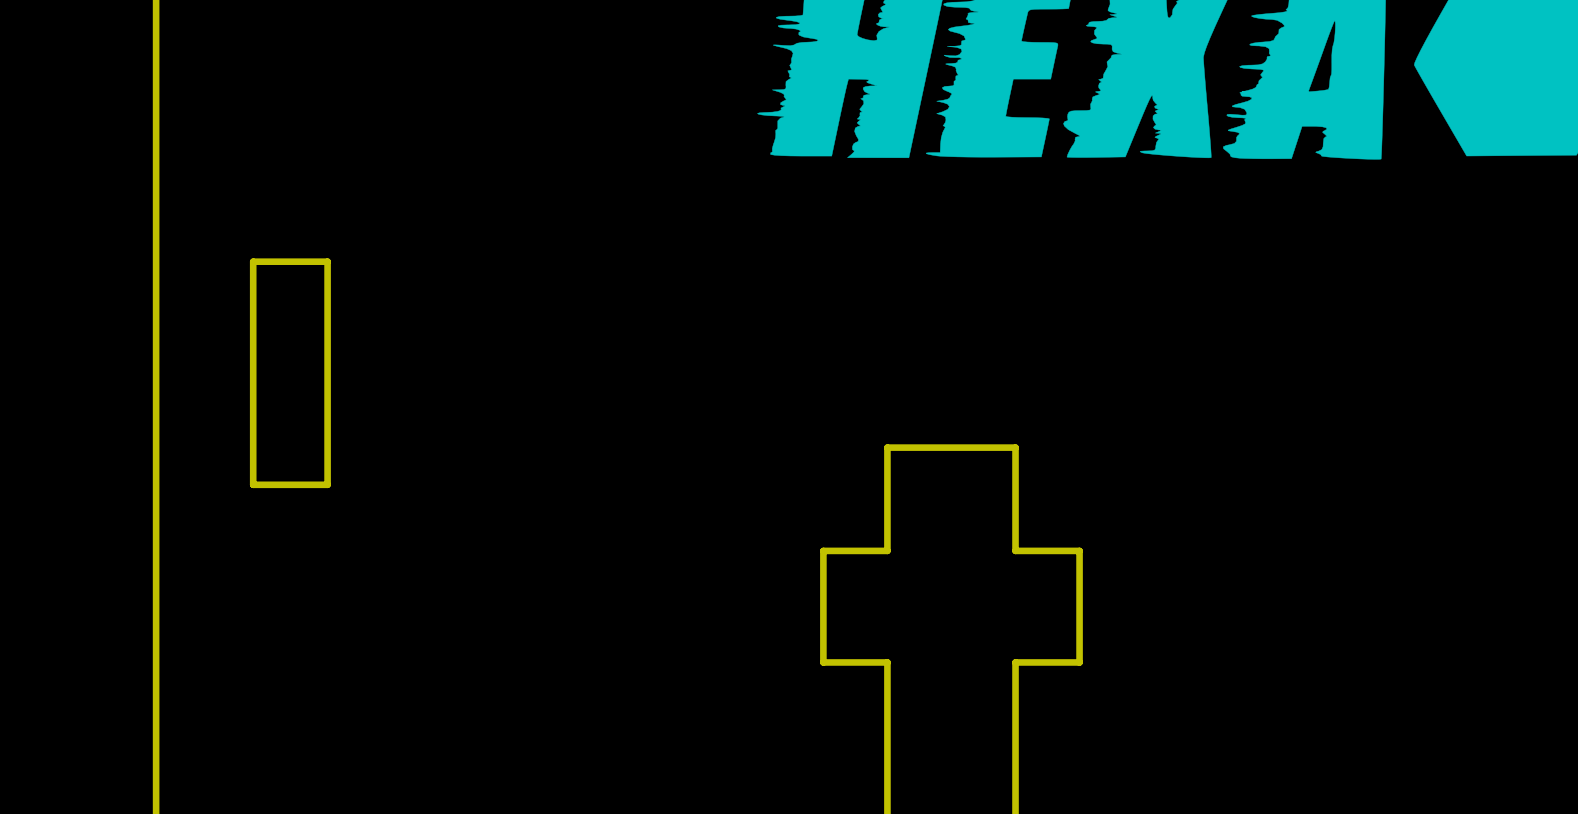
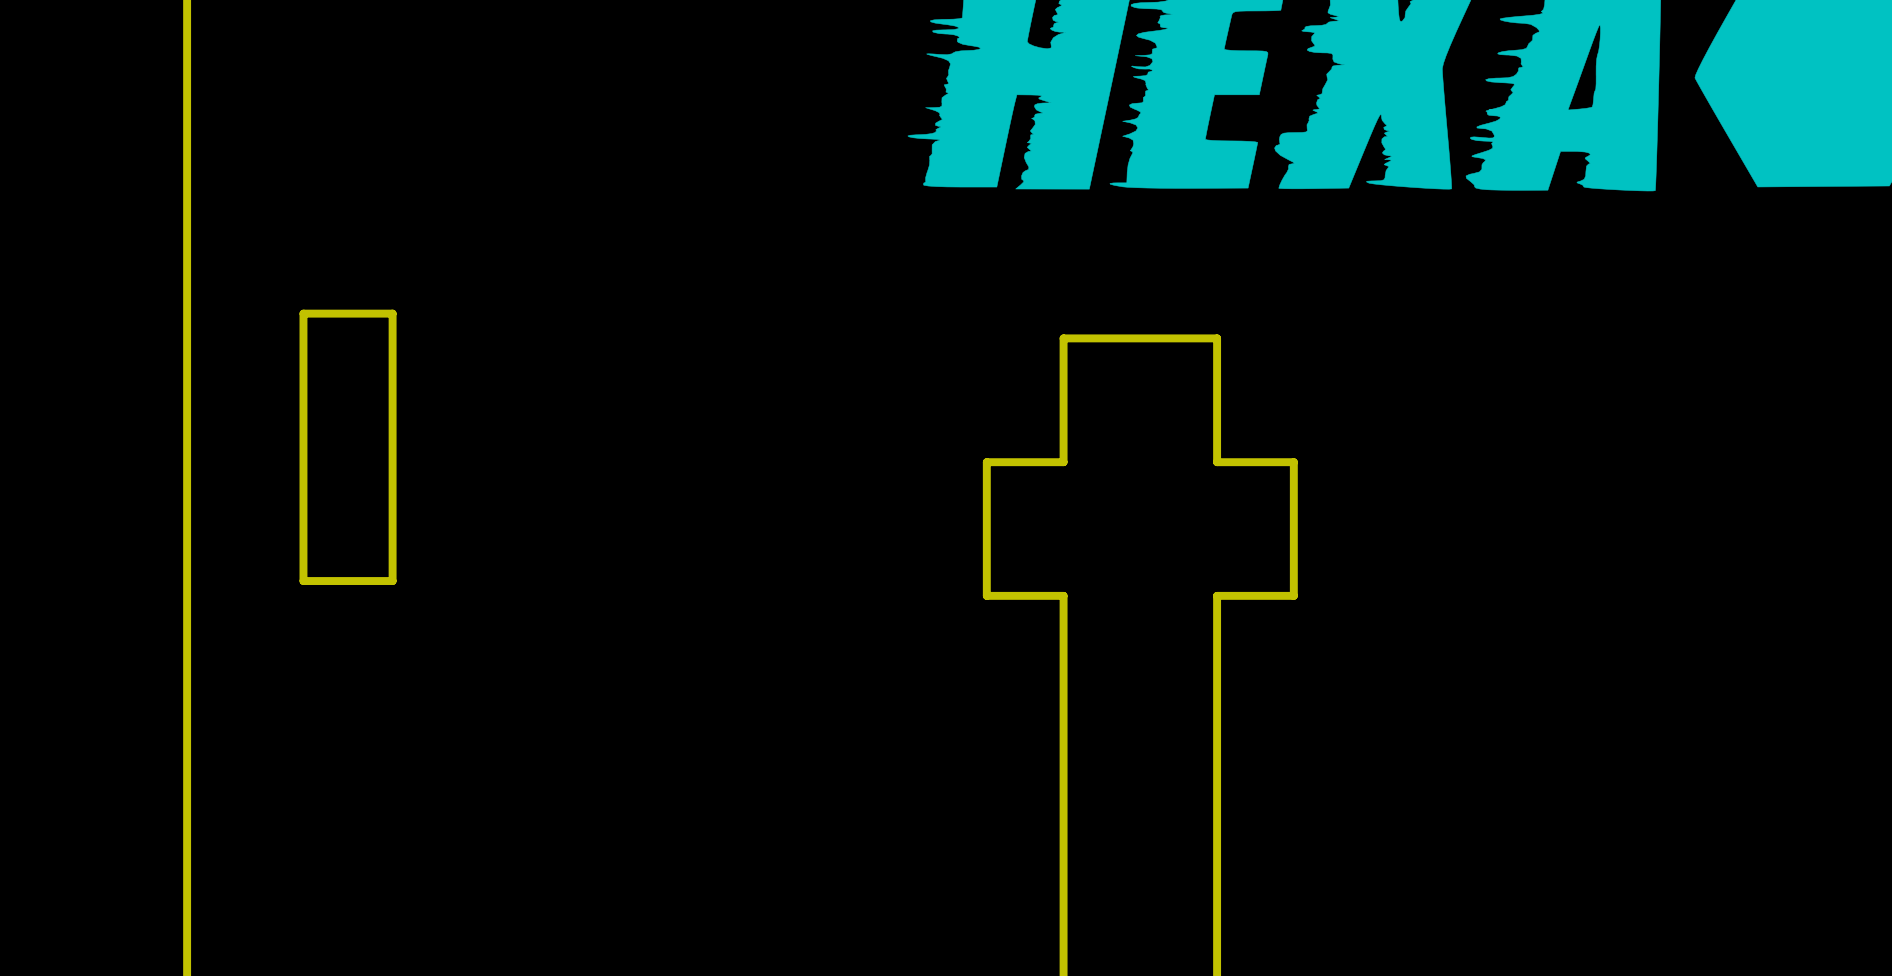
board edge: (1015, 497) (1015, 447) (887, 447) (887, 497) -> (1217, 595) (1293, 595) (1293, 462) (1217, 462) (1217, 338) (1063, 338) (1063, 462) (986, 462) (986, 595) (1063, 595)
board edge: (887, 550) (823, 550) (823, 662) (887, 662) -> (1063, 660) (1063, 793)
board edge: (1015, 550) (1079, 550) (1079, 662) (1015, 662) -> (1217, 660) (1217, 793)

